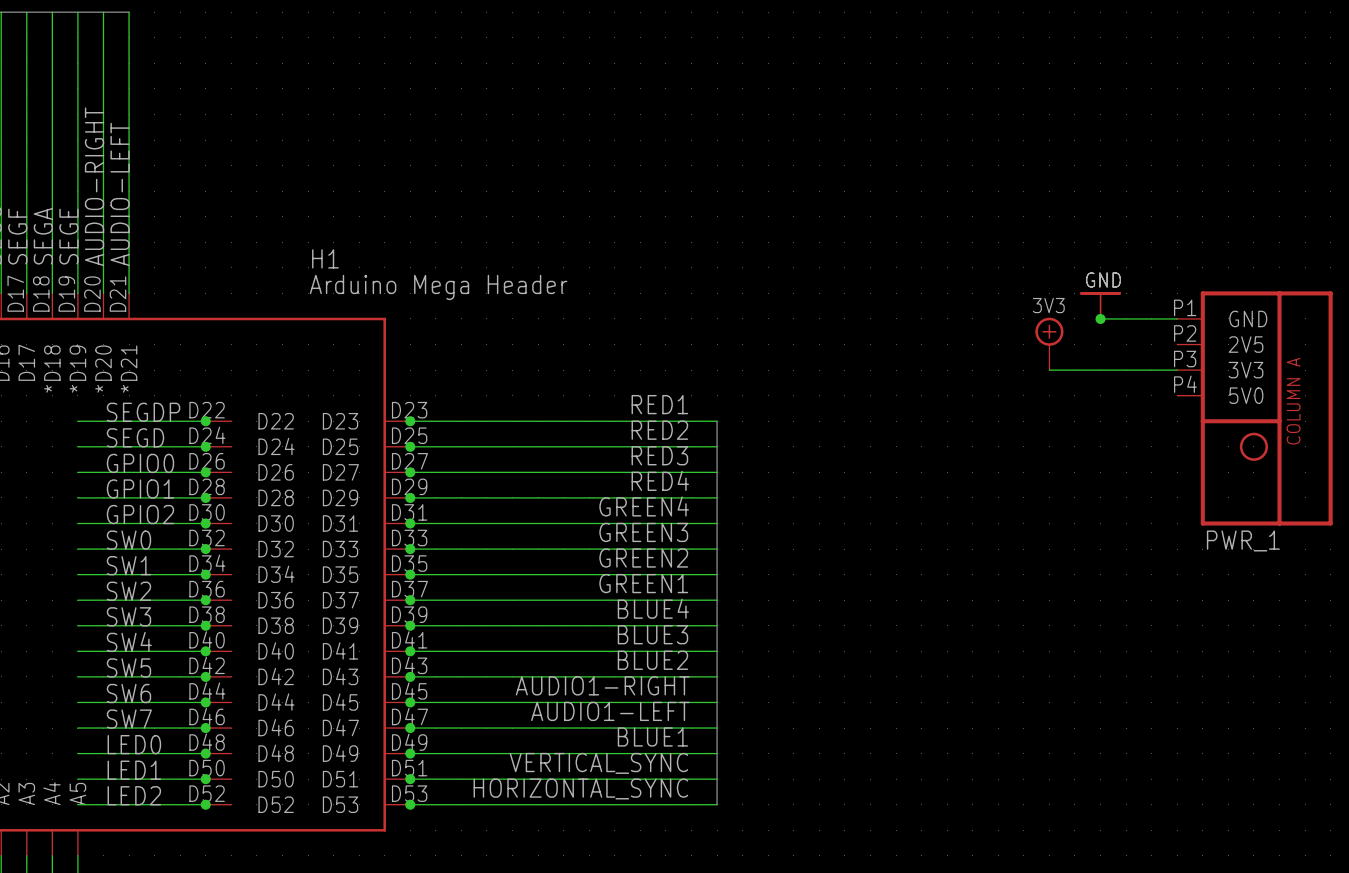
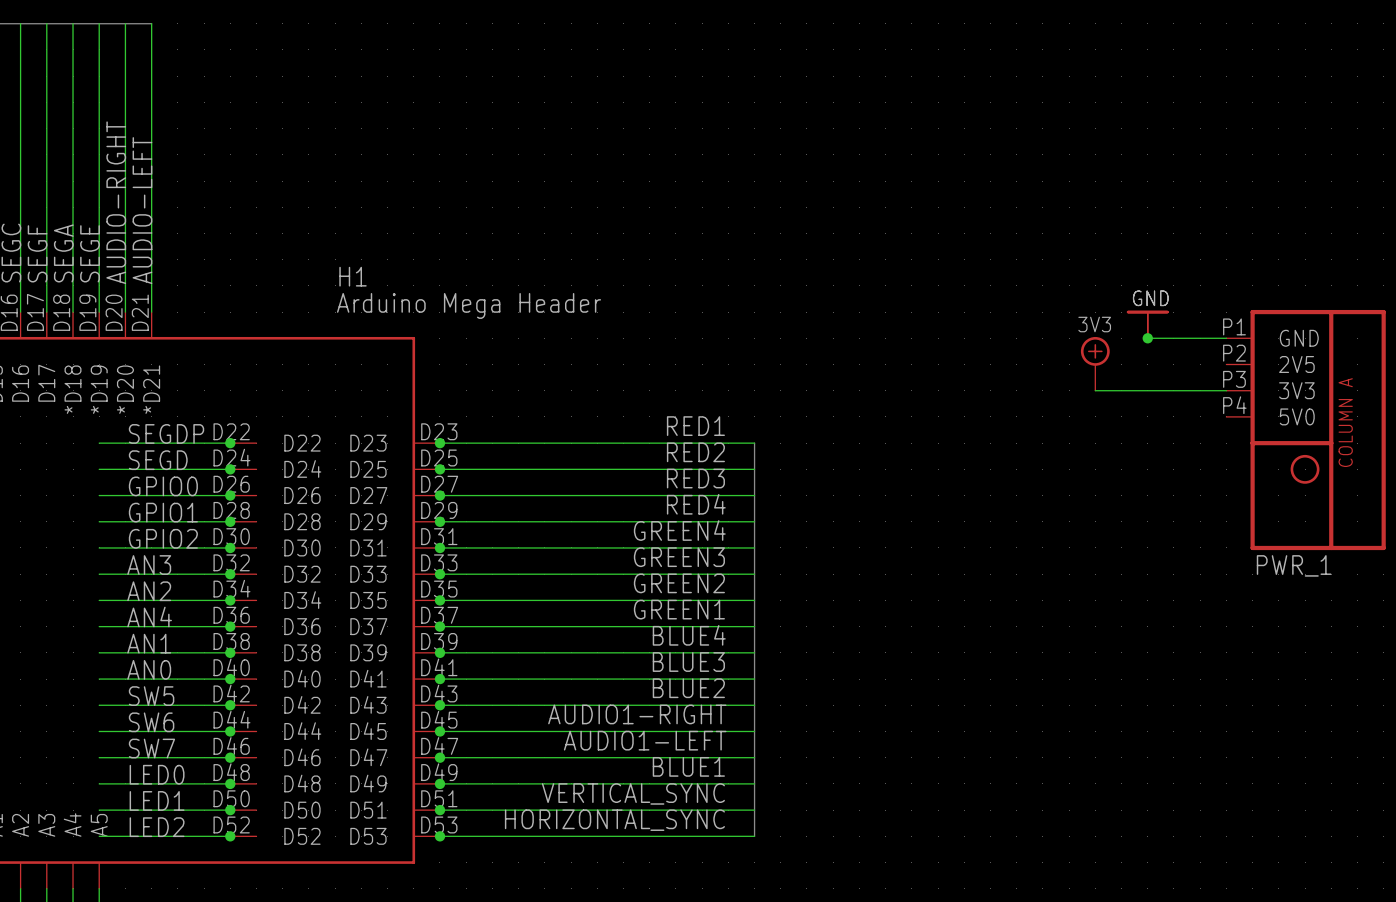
label: SW0 (128, 540) -> AN3 (149, 565)
label: SW1 (128, 565) -> AN2 (149, 591)
label: SW2 (128, 591) -> AN4 (149, 617)
label: SW3 (128, 616) -> AN1 (149, 643)
label: SW4 (129, 641) -> AN0 (149, 669)

